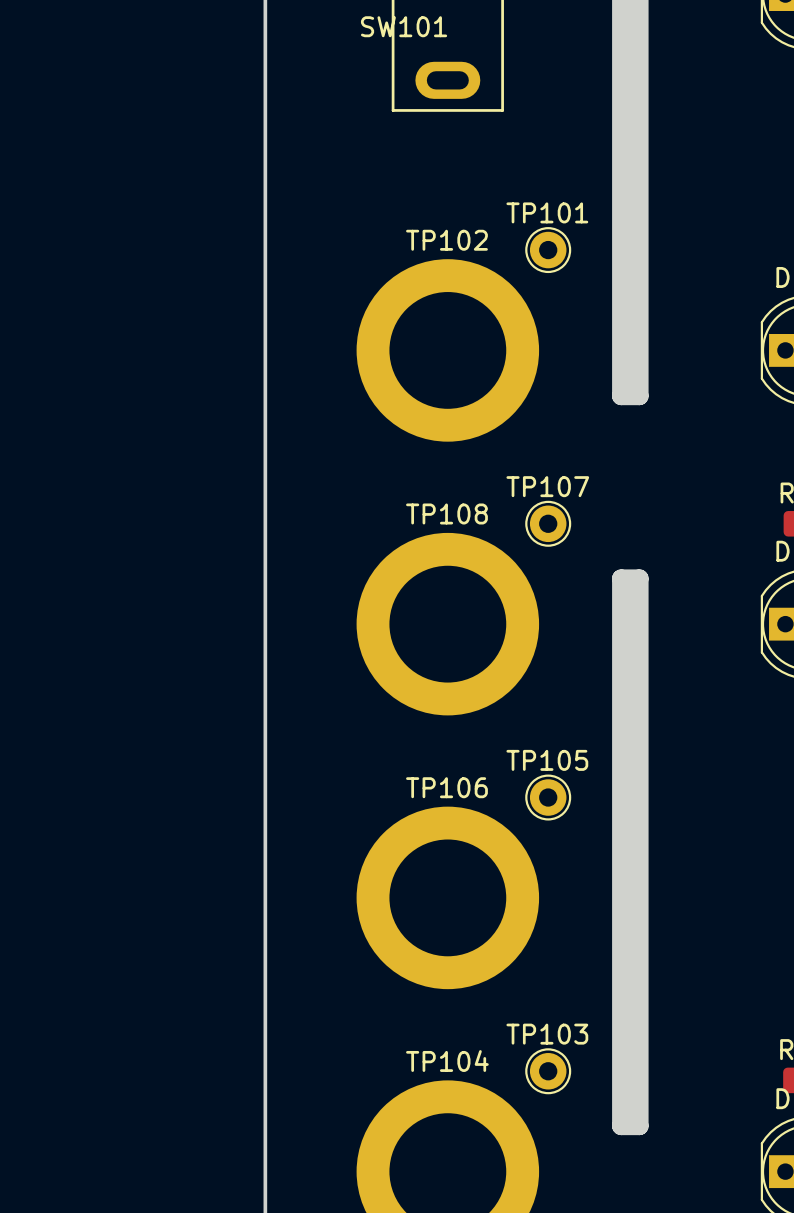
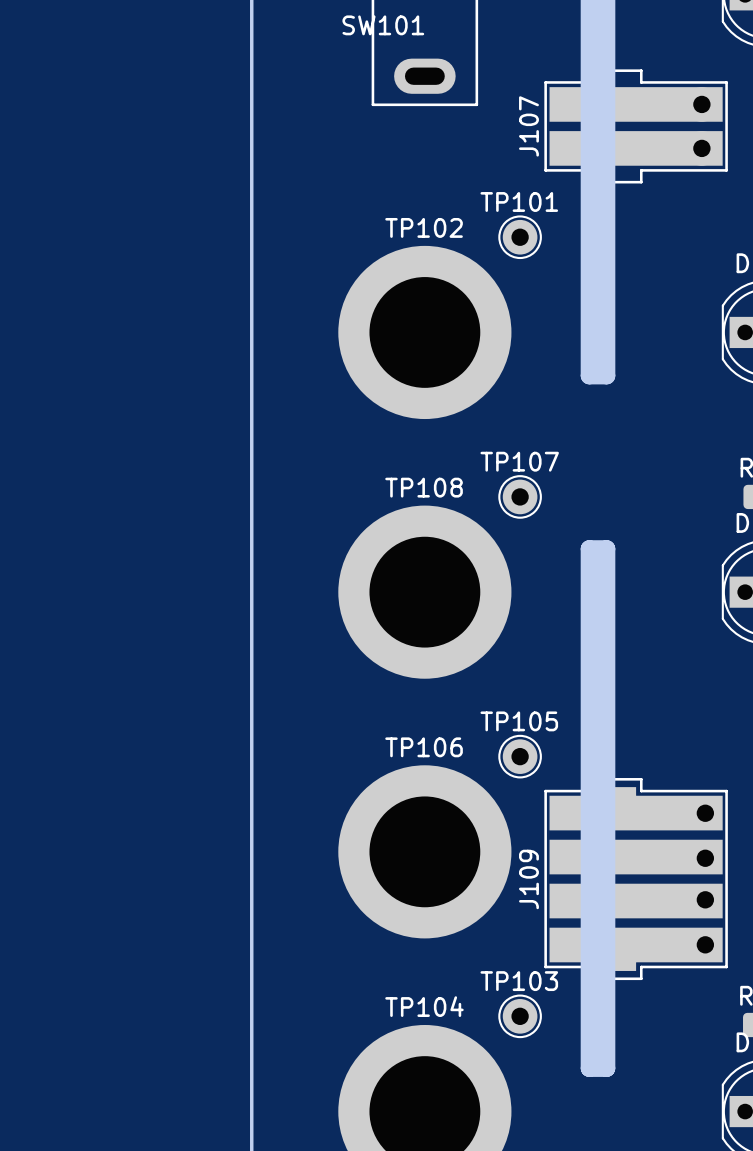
J107: none -> (636, 126)
J109: none -> (636, 879)

